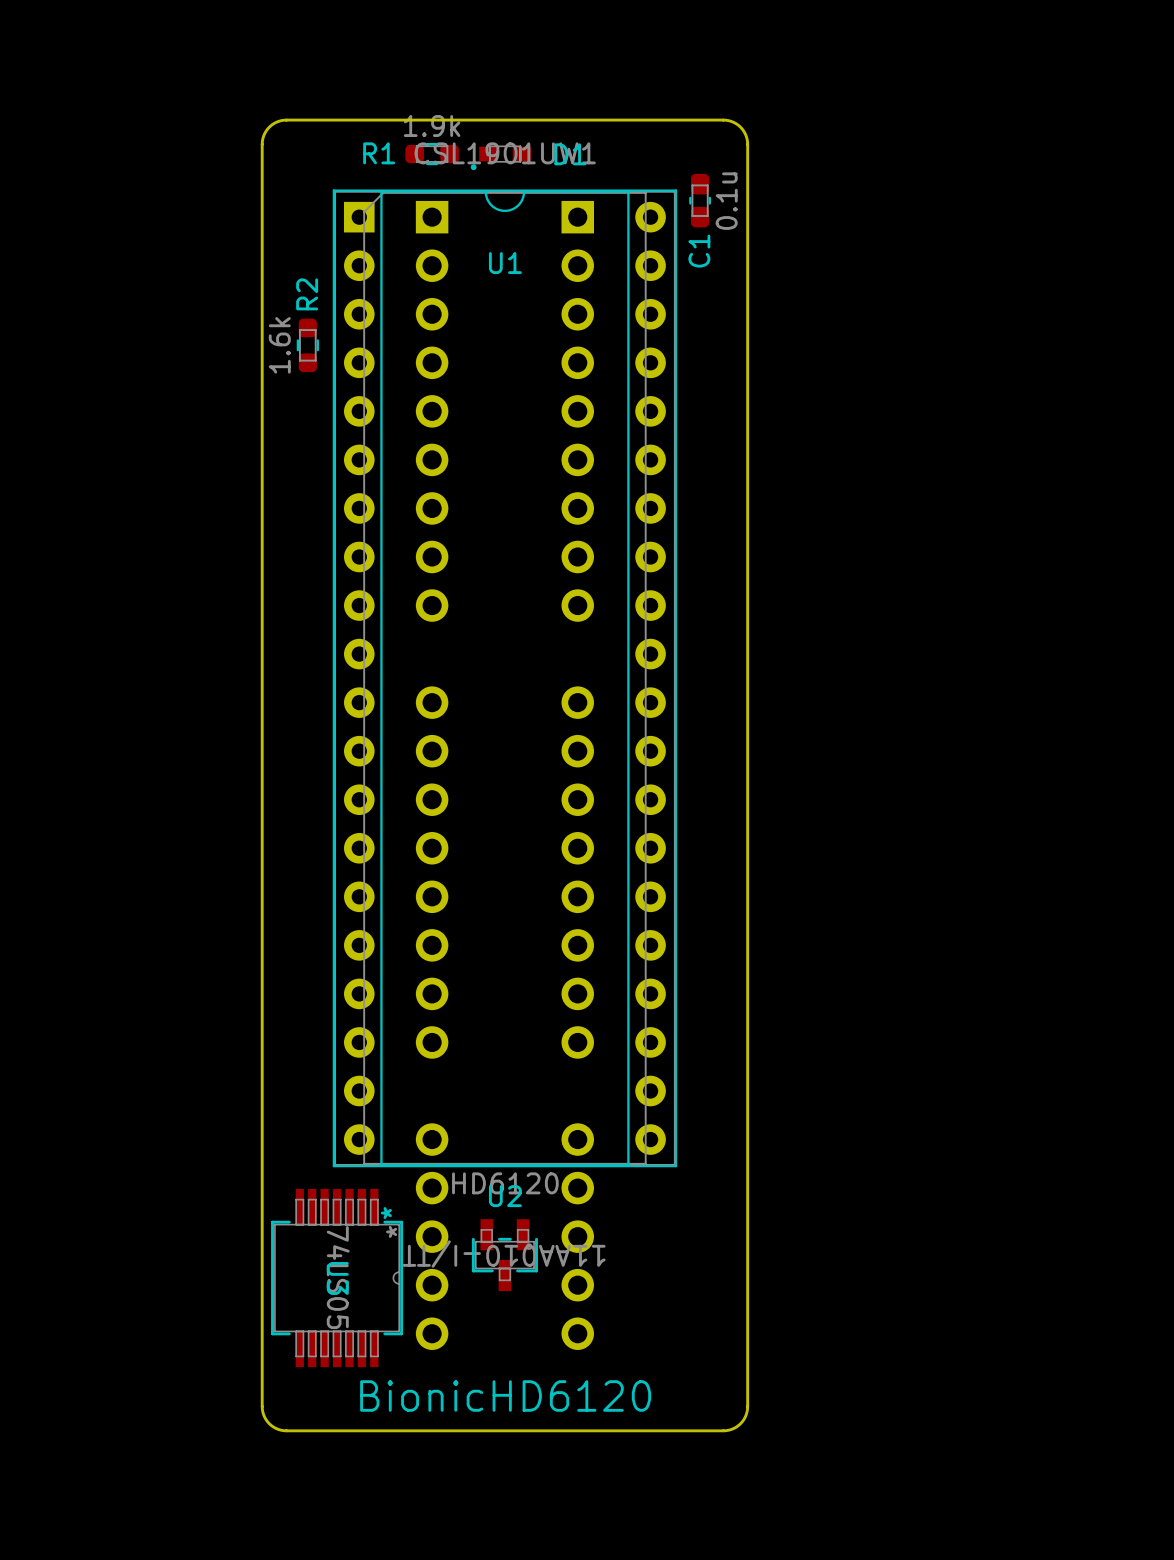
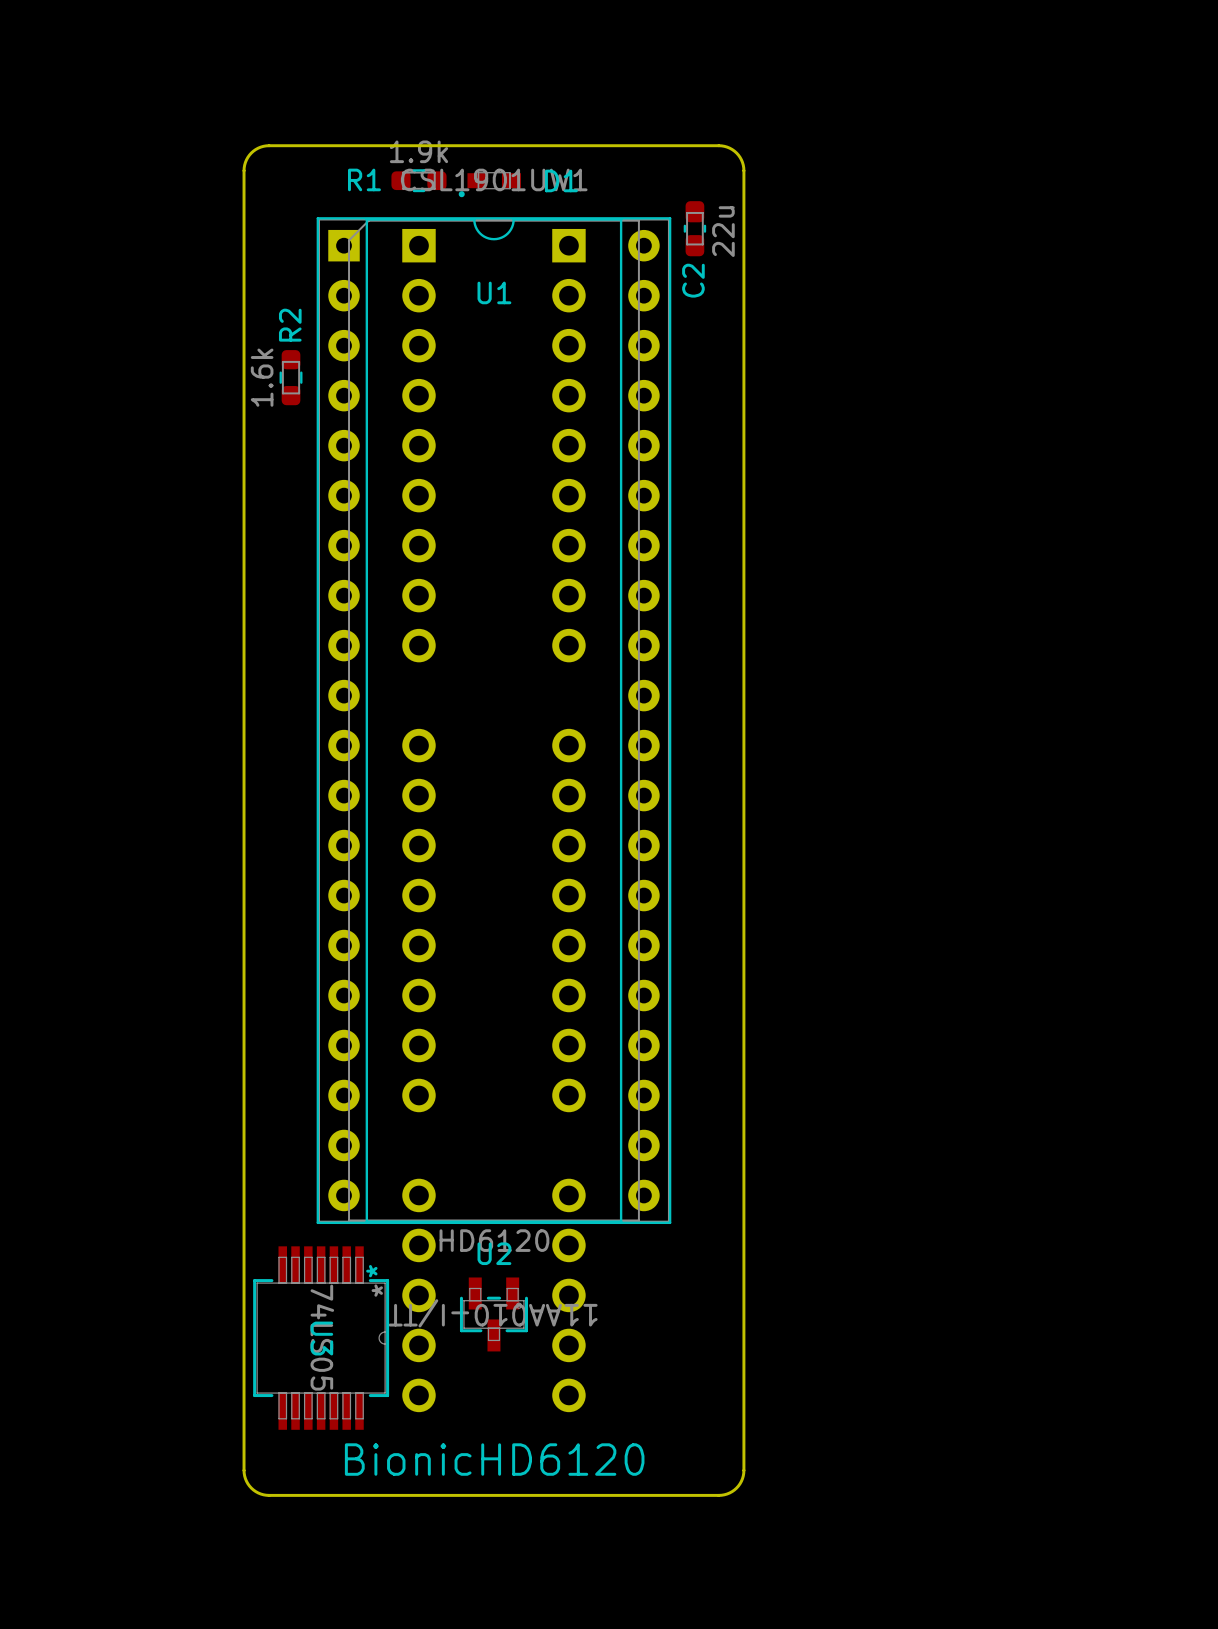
C1 value: 0.1u (726, 201) -> 22u (723, 231)
C1 name: C1 (699, 251) -> C2 (693, 280)

